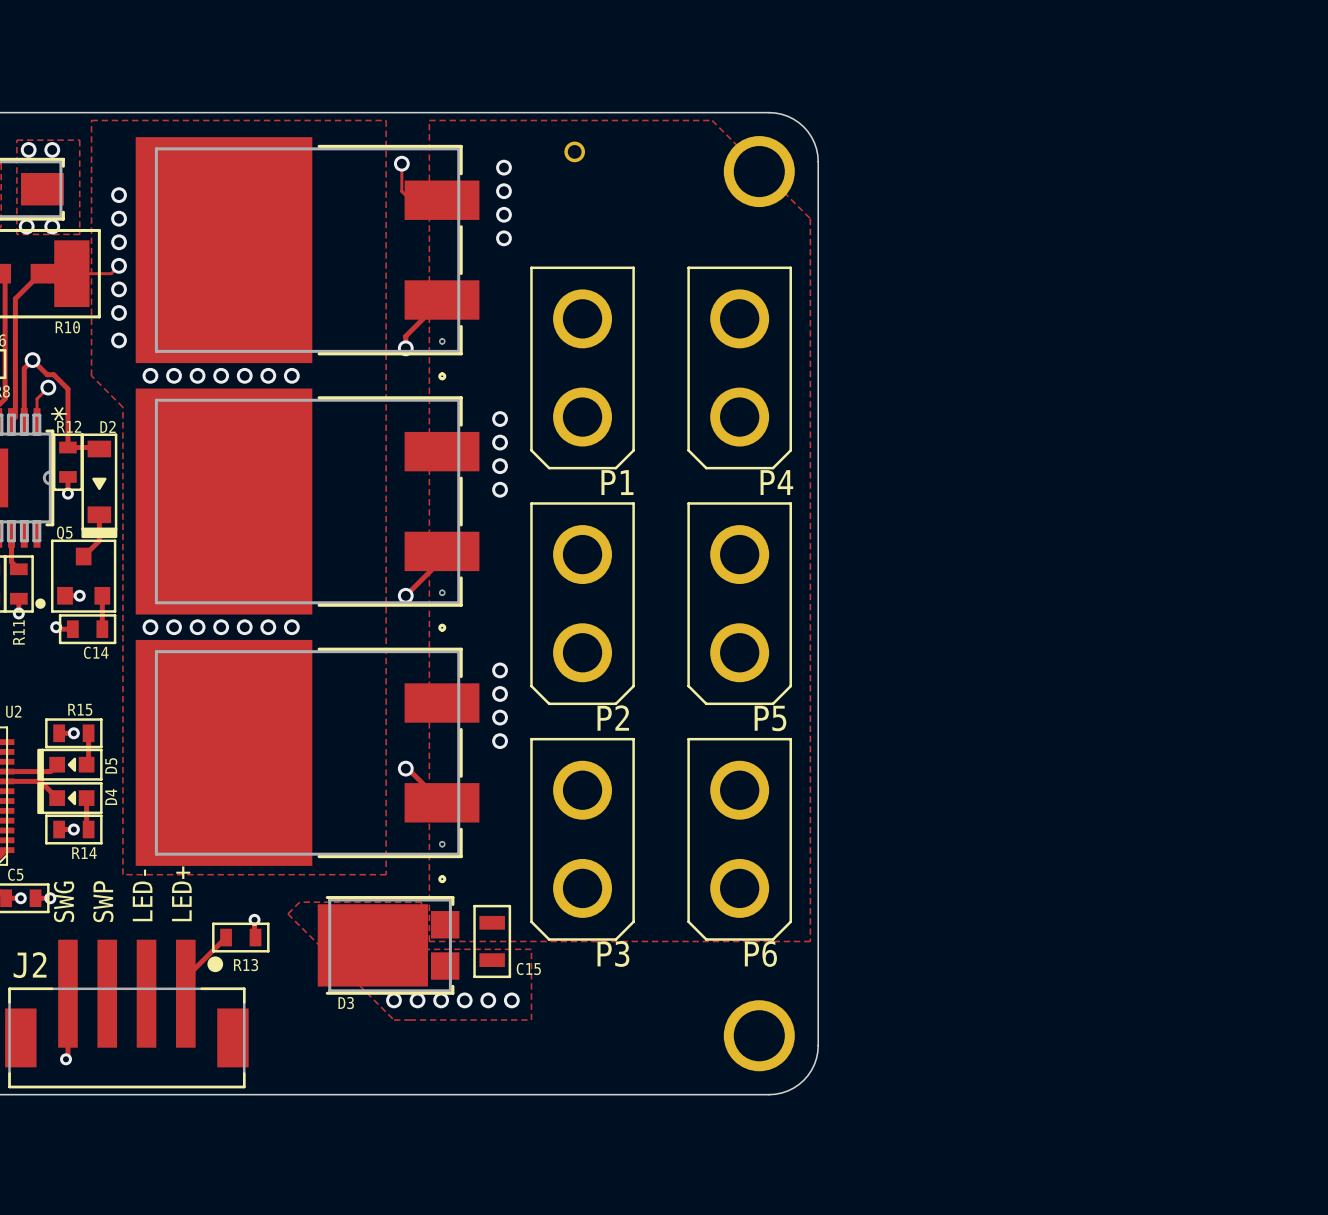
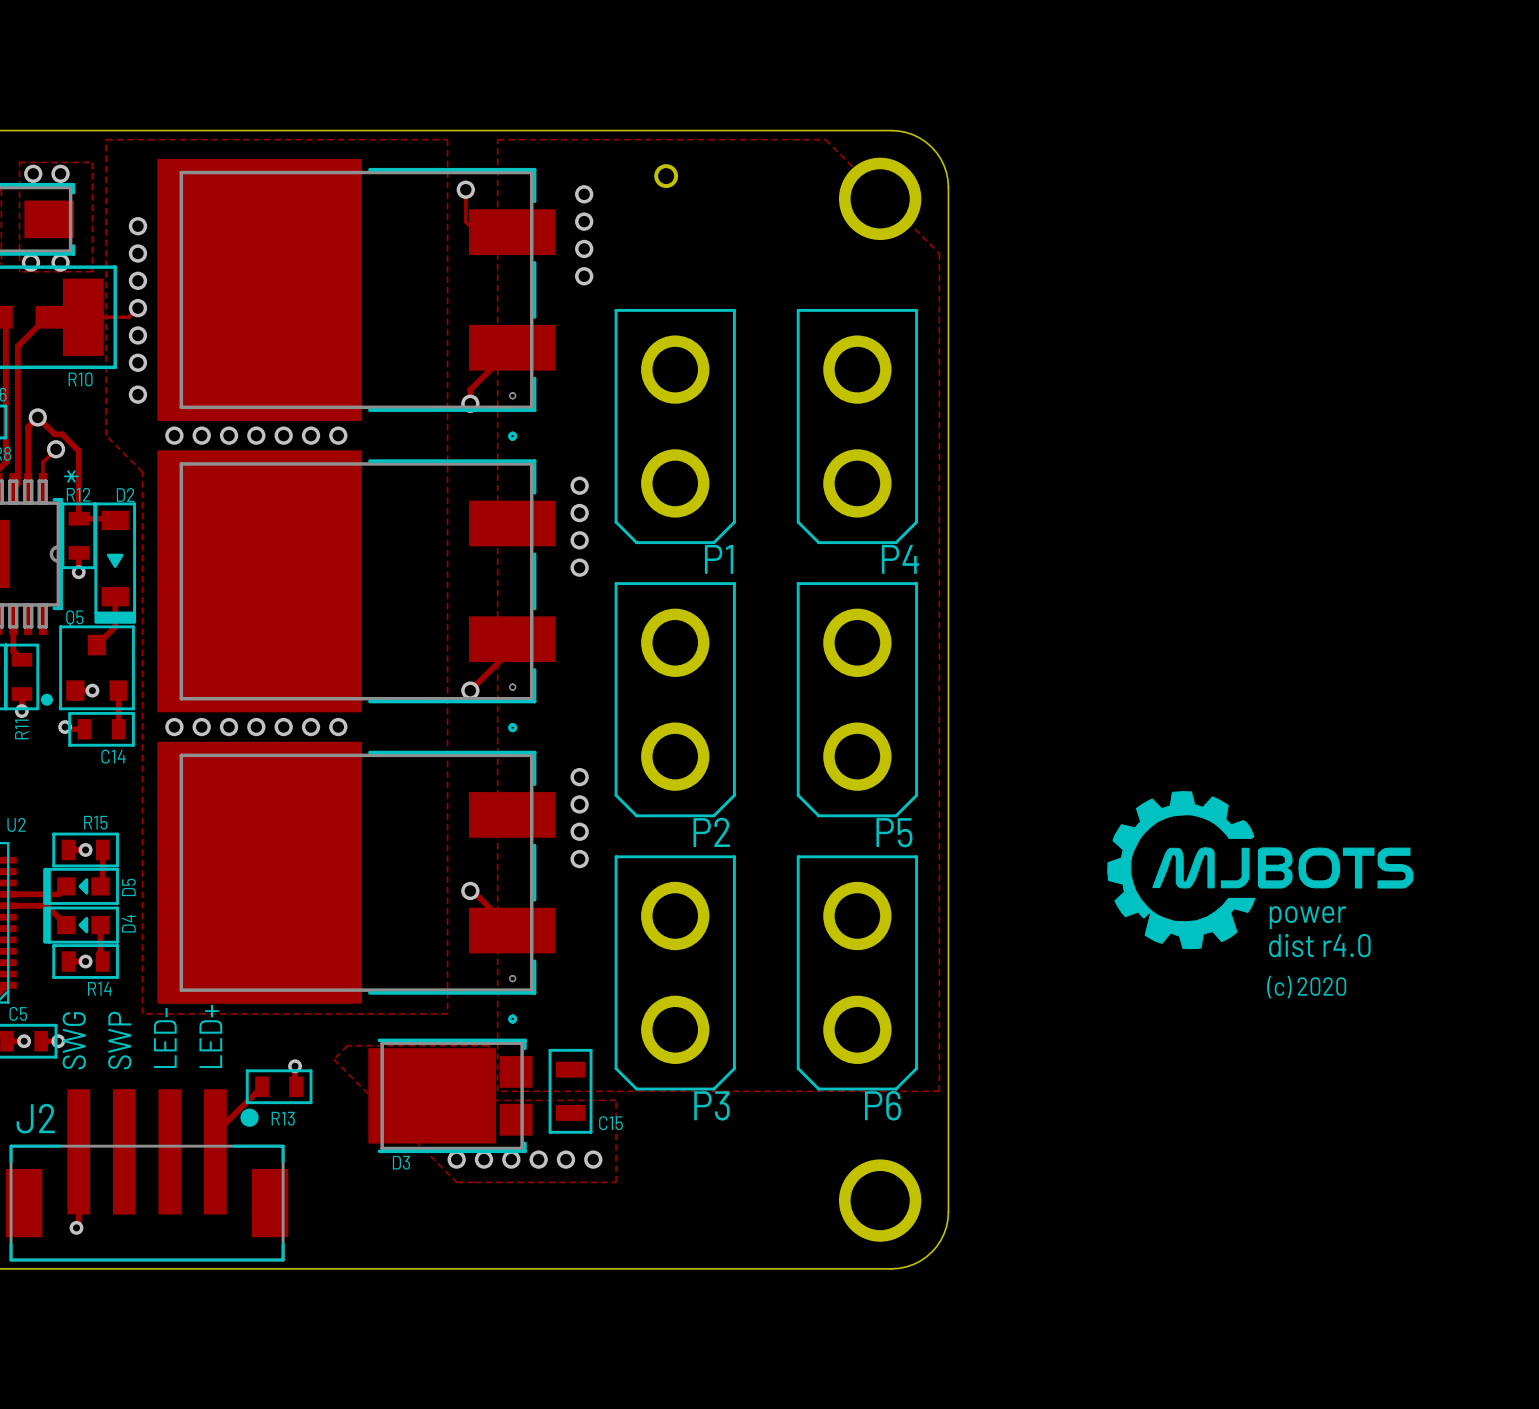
drawing: none -> [1107, 791, 1414, 950]
text: none -> power (1307, 917)
text: none -> dist r4.0 (1319, 945)
text: none -> (c) 2020 (1306, 987)

